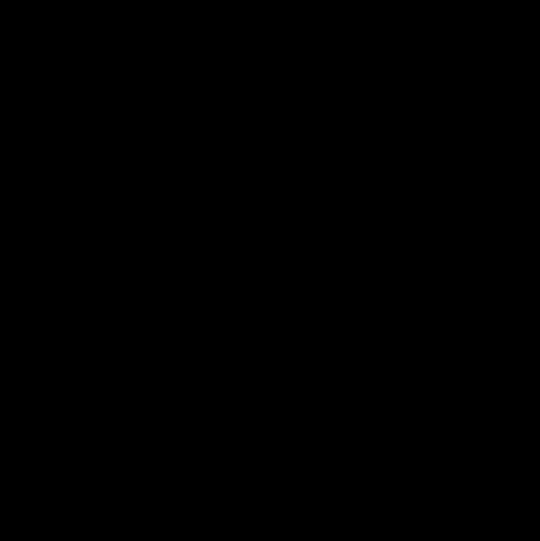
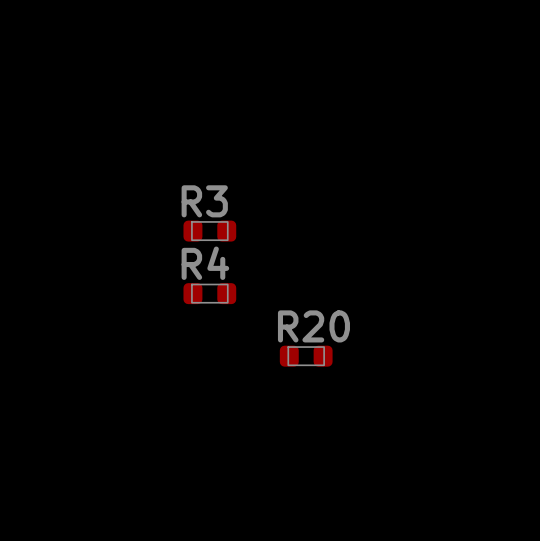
R3: none -> (209, 231)
R4: none -> (209, 293)
R20: none -> (306, 356)

